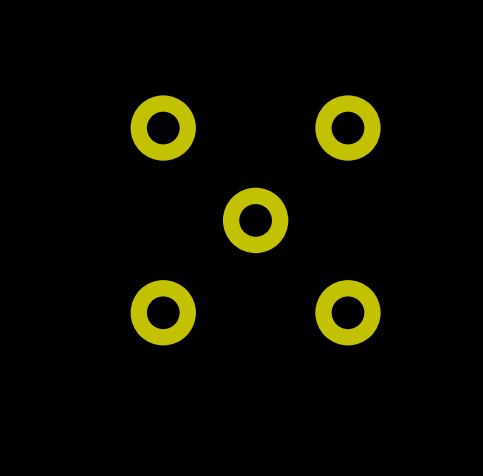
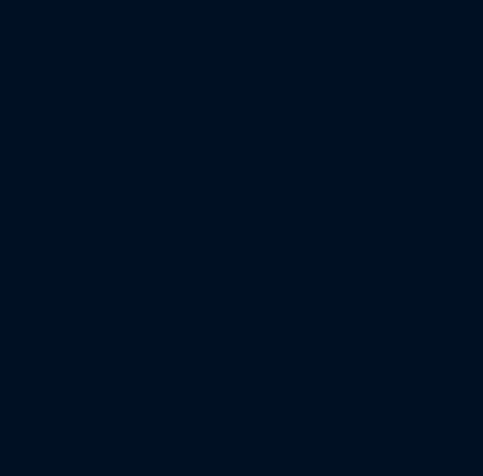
part: (255, 220) -> none

